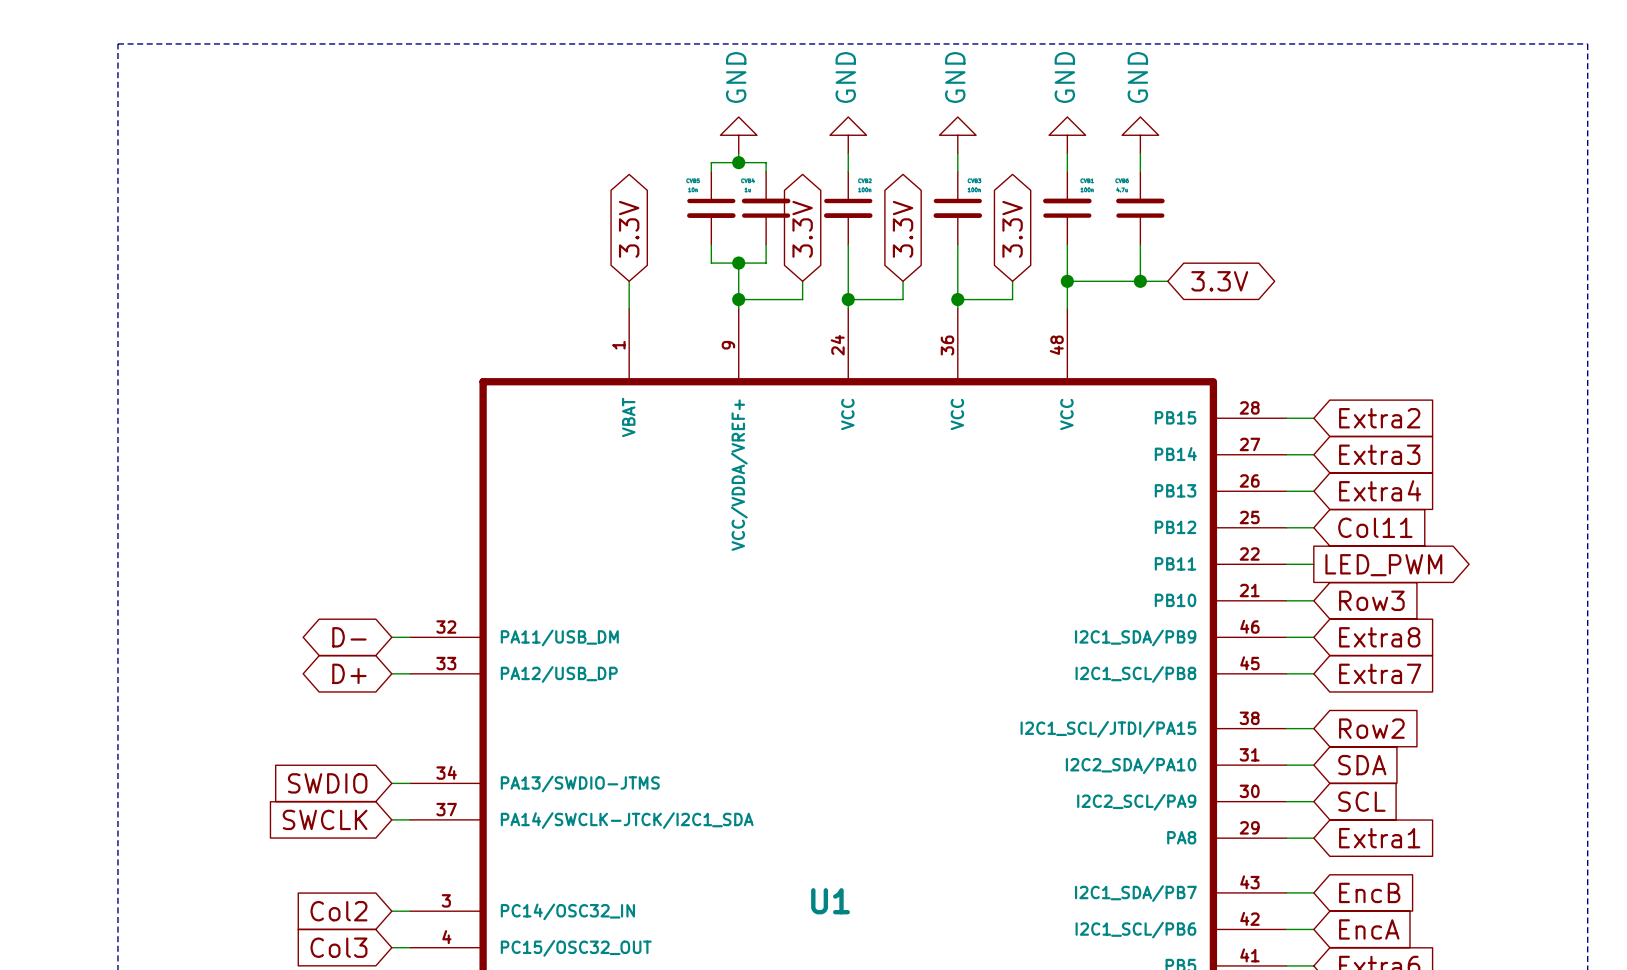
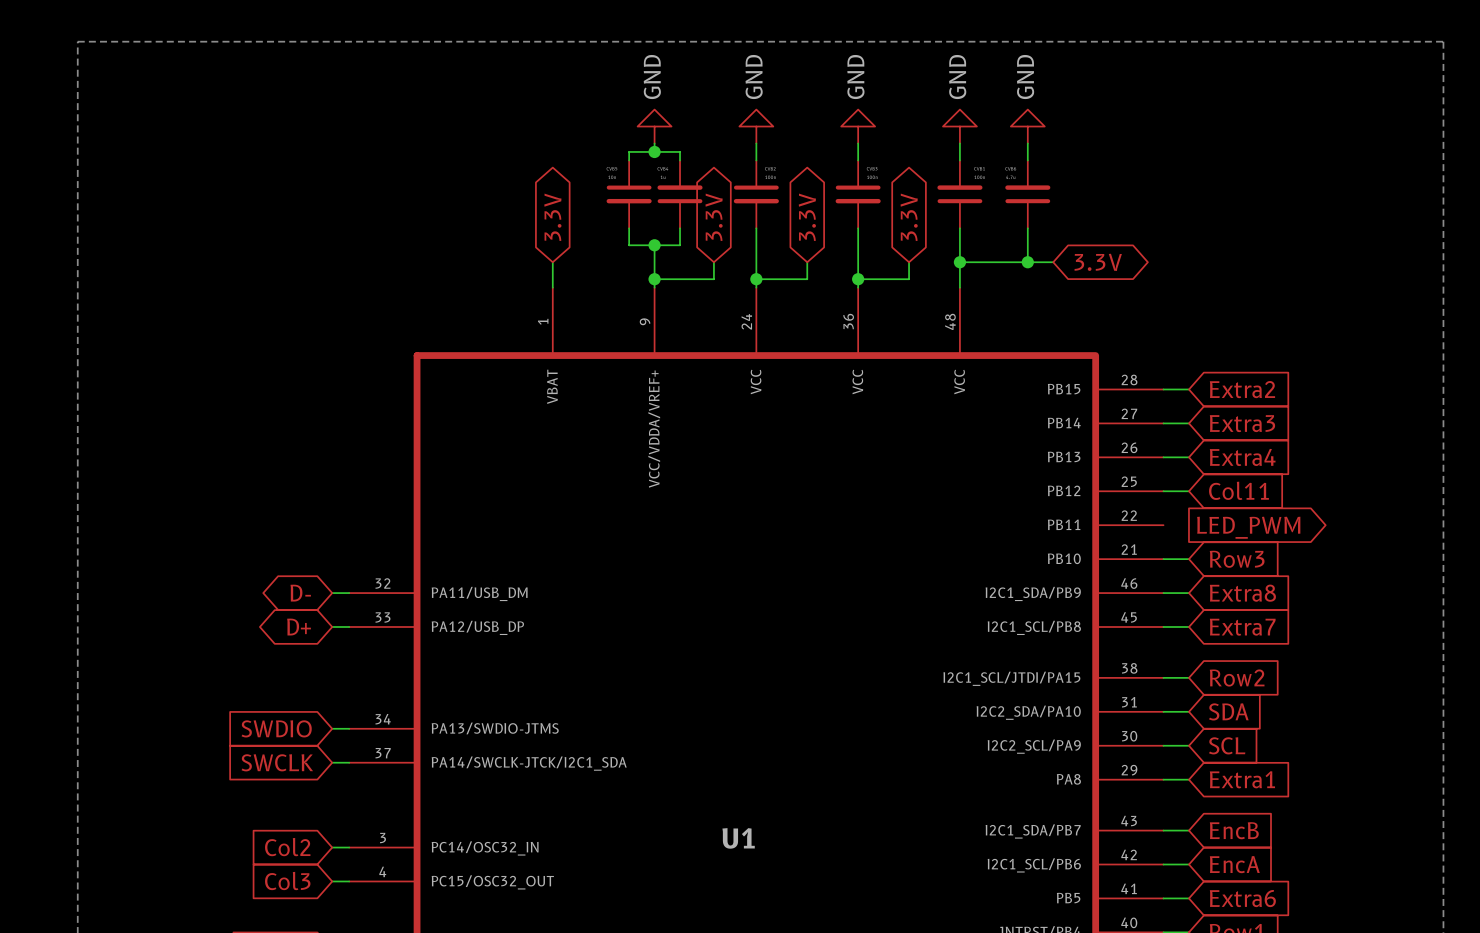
wire: (1286, 564) (1313, 564) -> none

